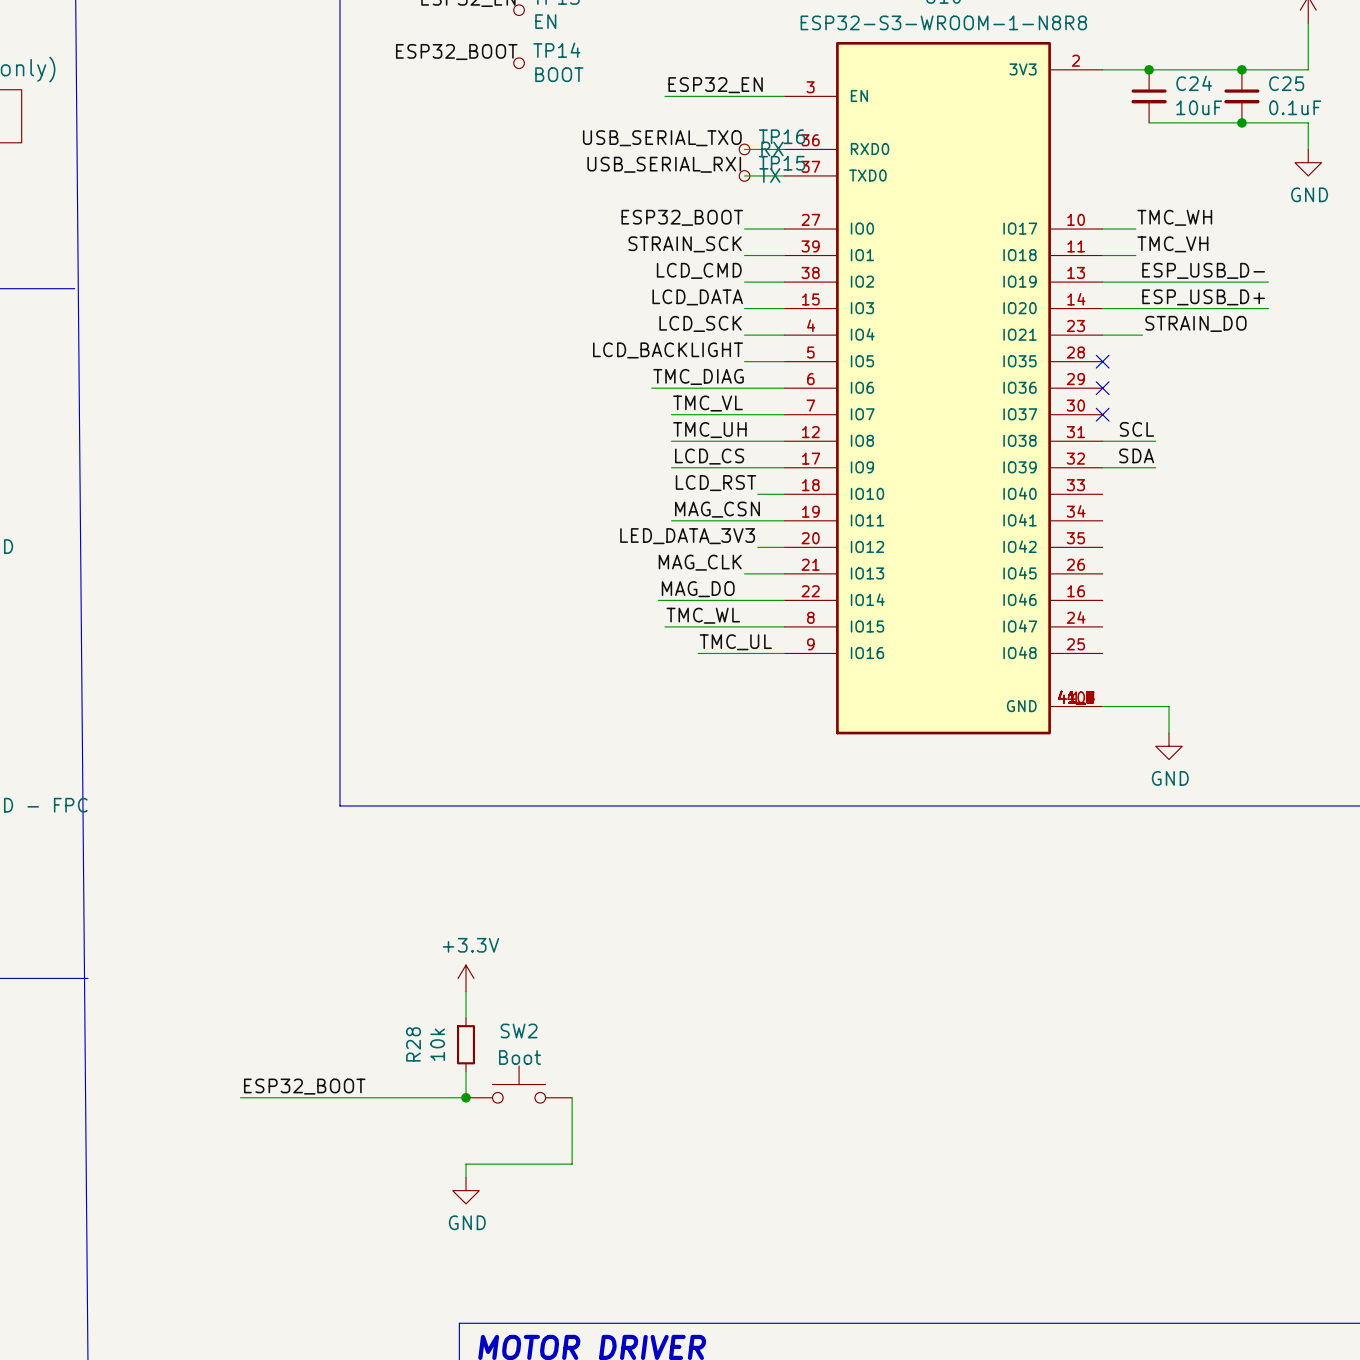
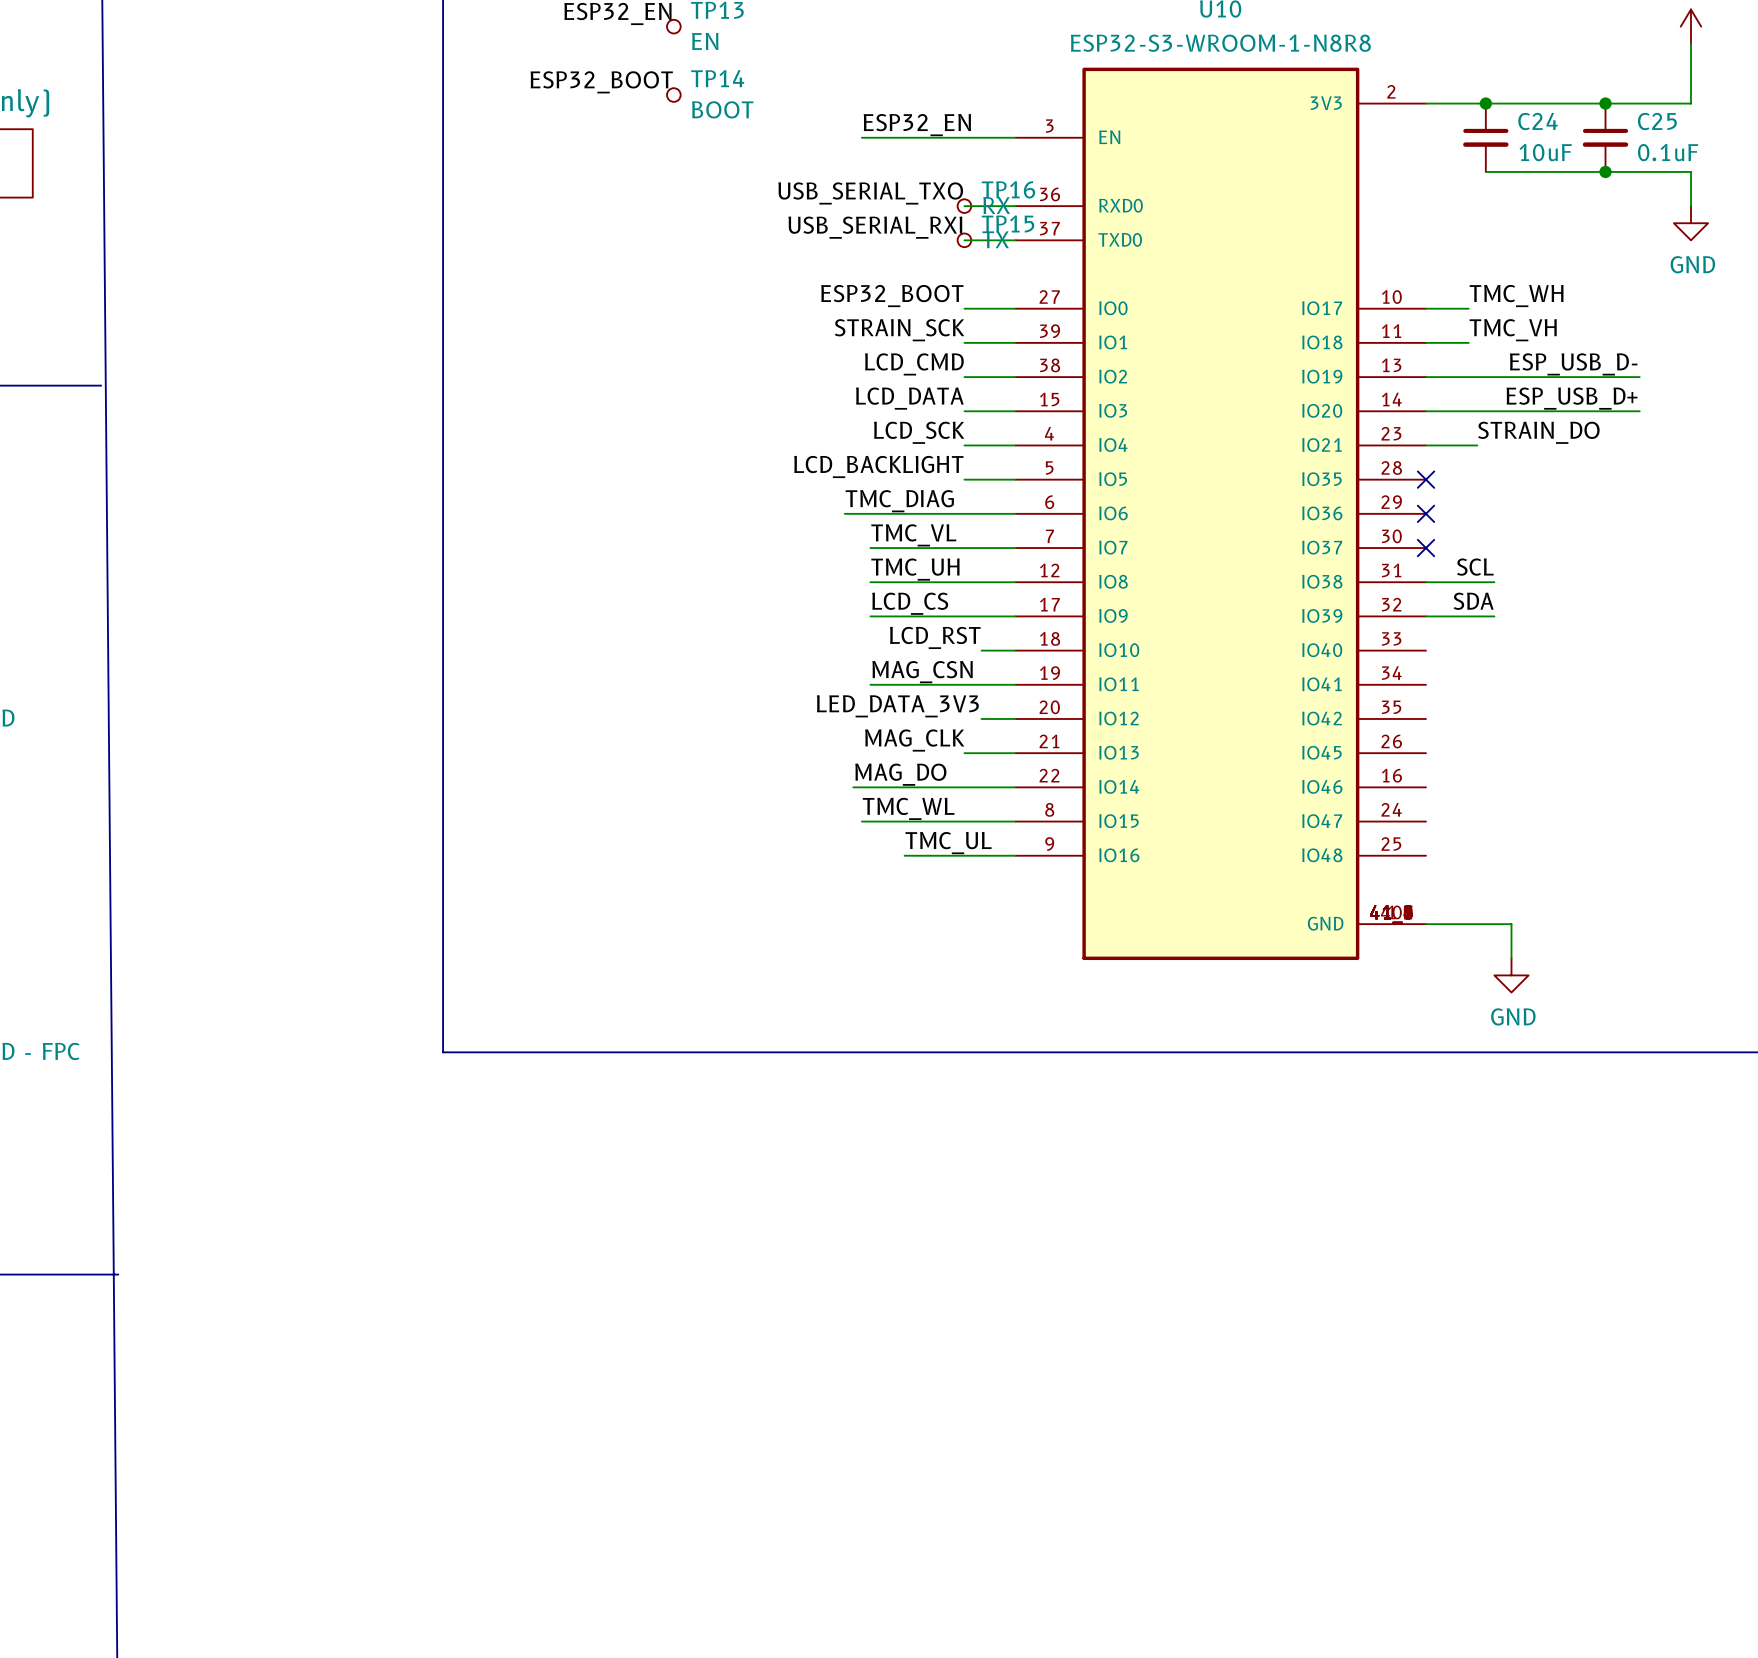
power symbol: +3.3V (466, 978) -> none
wire: (466, 991) (466, 1018) -> none
R28: 10k (466, 1044) -> none
wire: (466, 1071) (466, 1097) (240, 1097) -> none
SW2: Boot (519, 1084) -> none
label: ESP32_BOOT (304, 1086) -> none
junction: (466, 1097) -> none
wire: (572, 1097) (572, 1164) (466, 1164) (466, 1177) -> none
power symbol: GND (466, 1190) -> none

